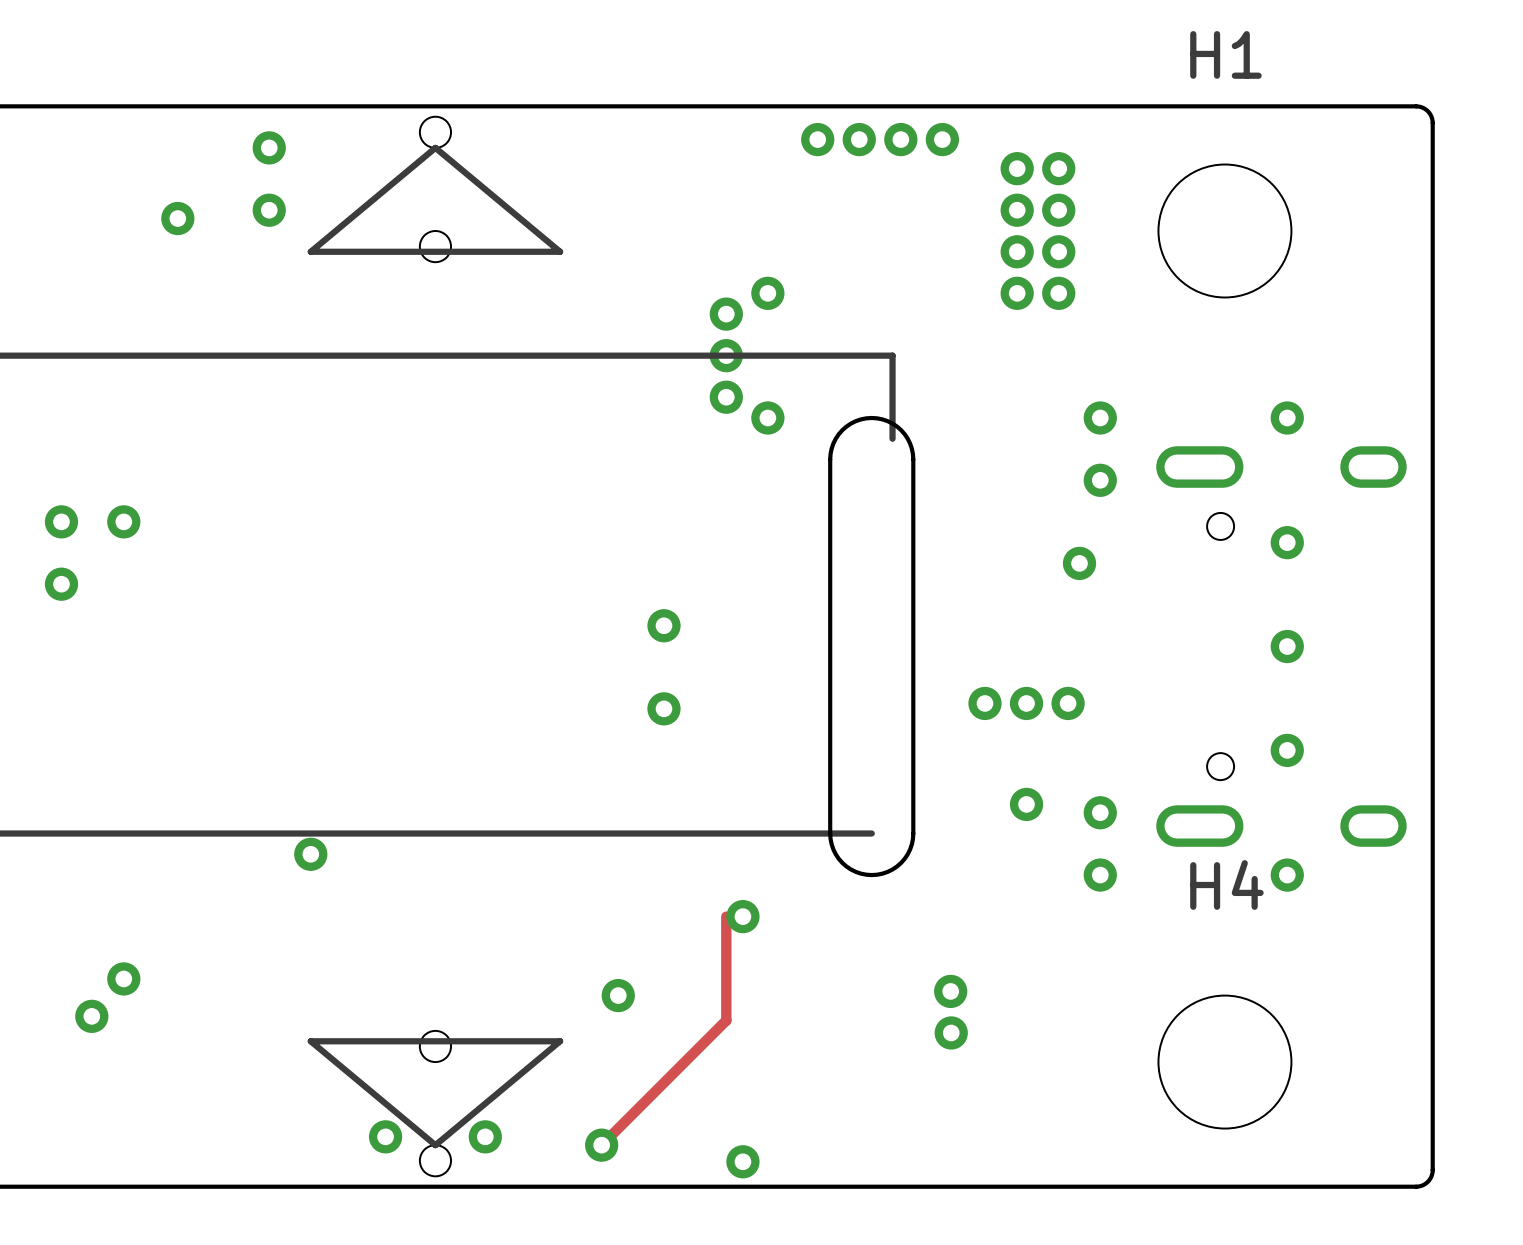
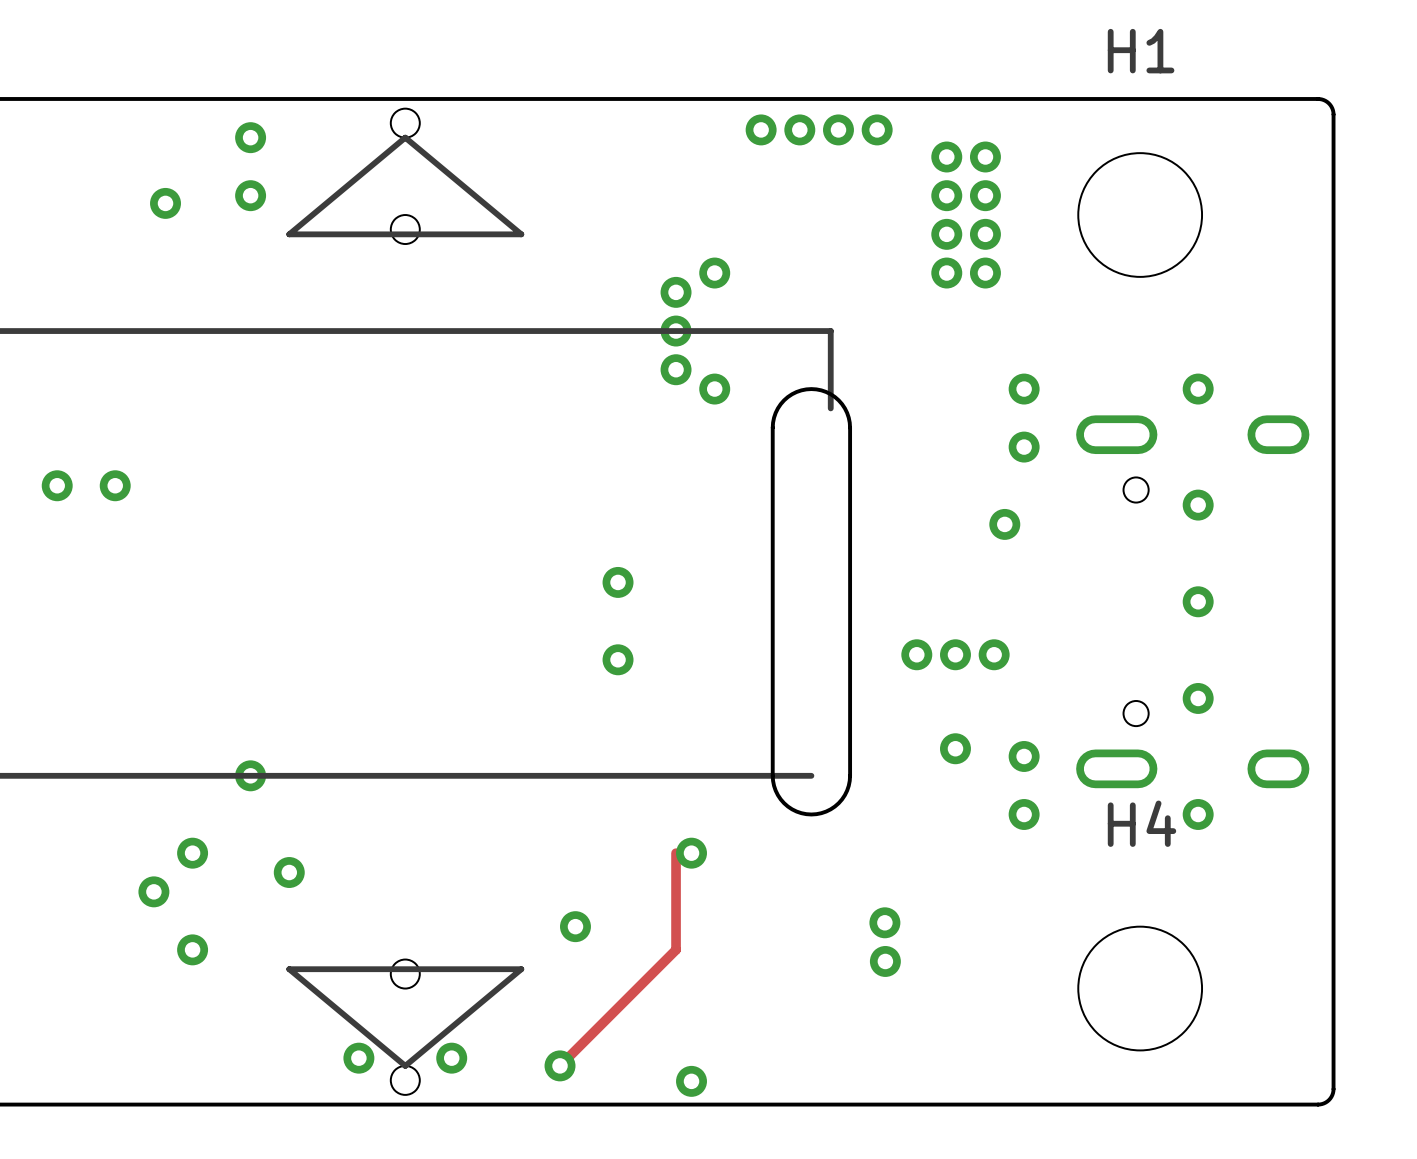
via: (61, 584) -> none
via: none -> (250, 775)
via: (310, 854) -> none
via: none -> (192, 853)
via: none -> (289, 872)
via: none -> (153, 891)
via: (123, 978) -> none
via: (91, 1016) -> none
via: none -> (192, 949)

